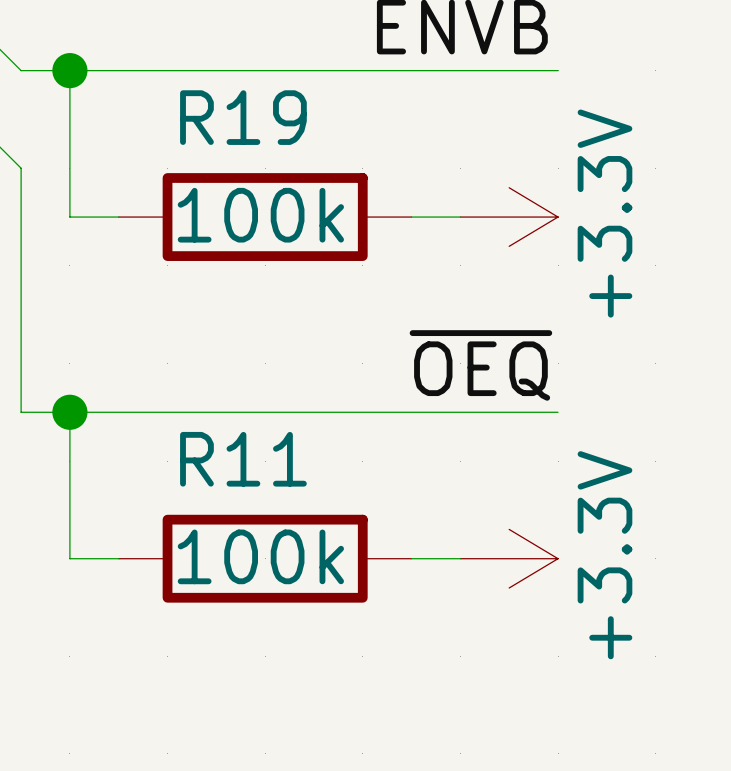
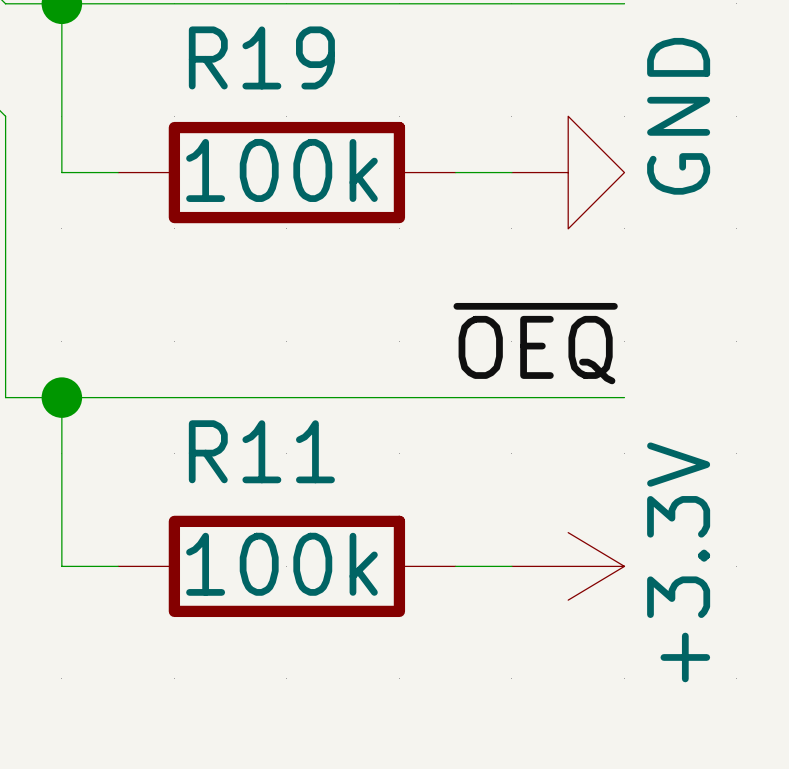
power symbol: +3.3V (509, 217) -> GND (568, 172)

